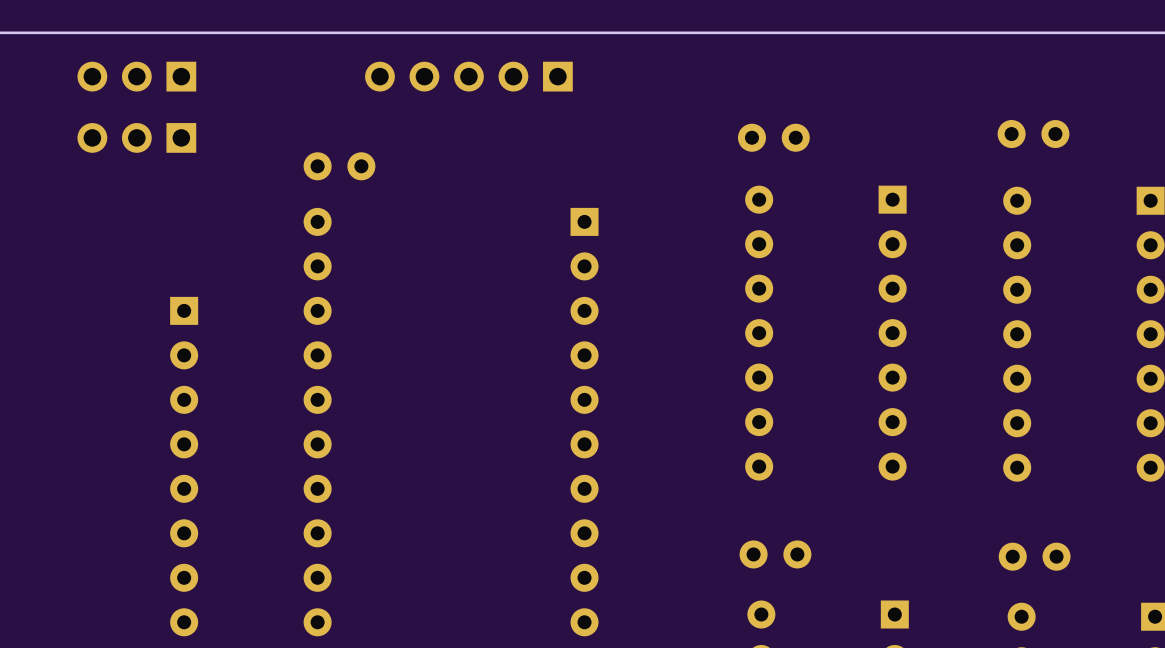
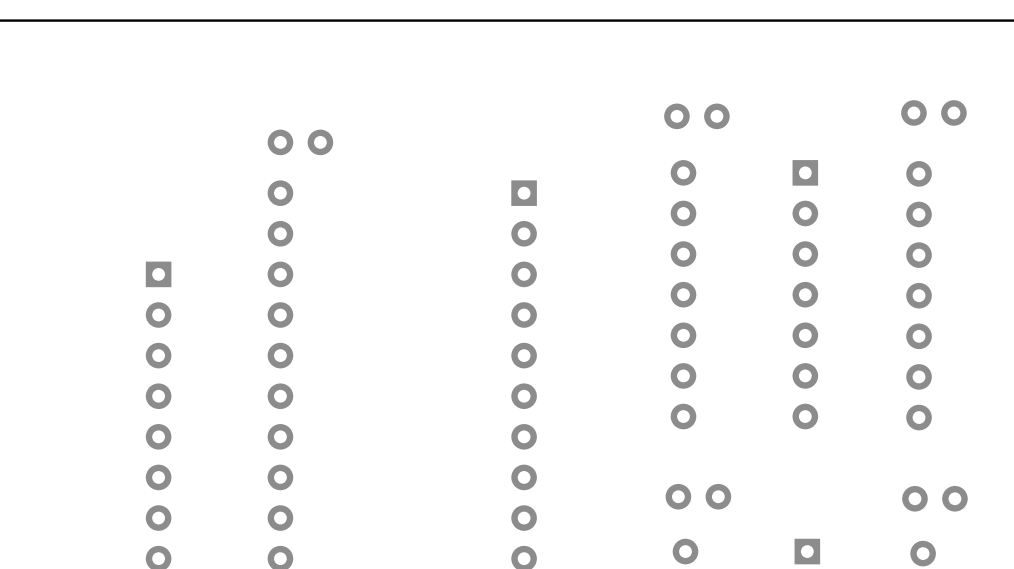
part: (136, 76) -> none
part: (468, 76) -> none
part: (136, 137) -> none

